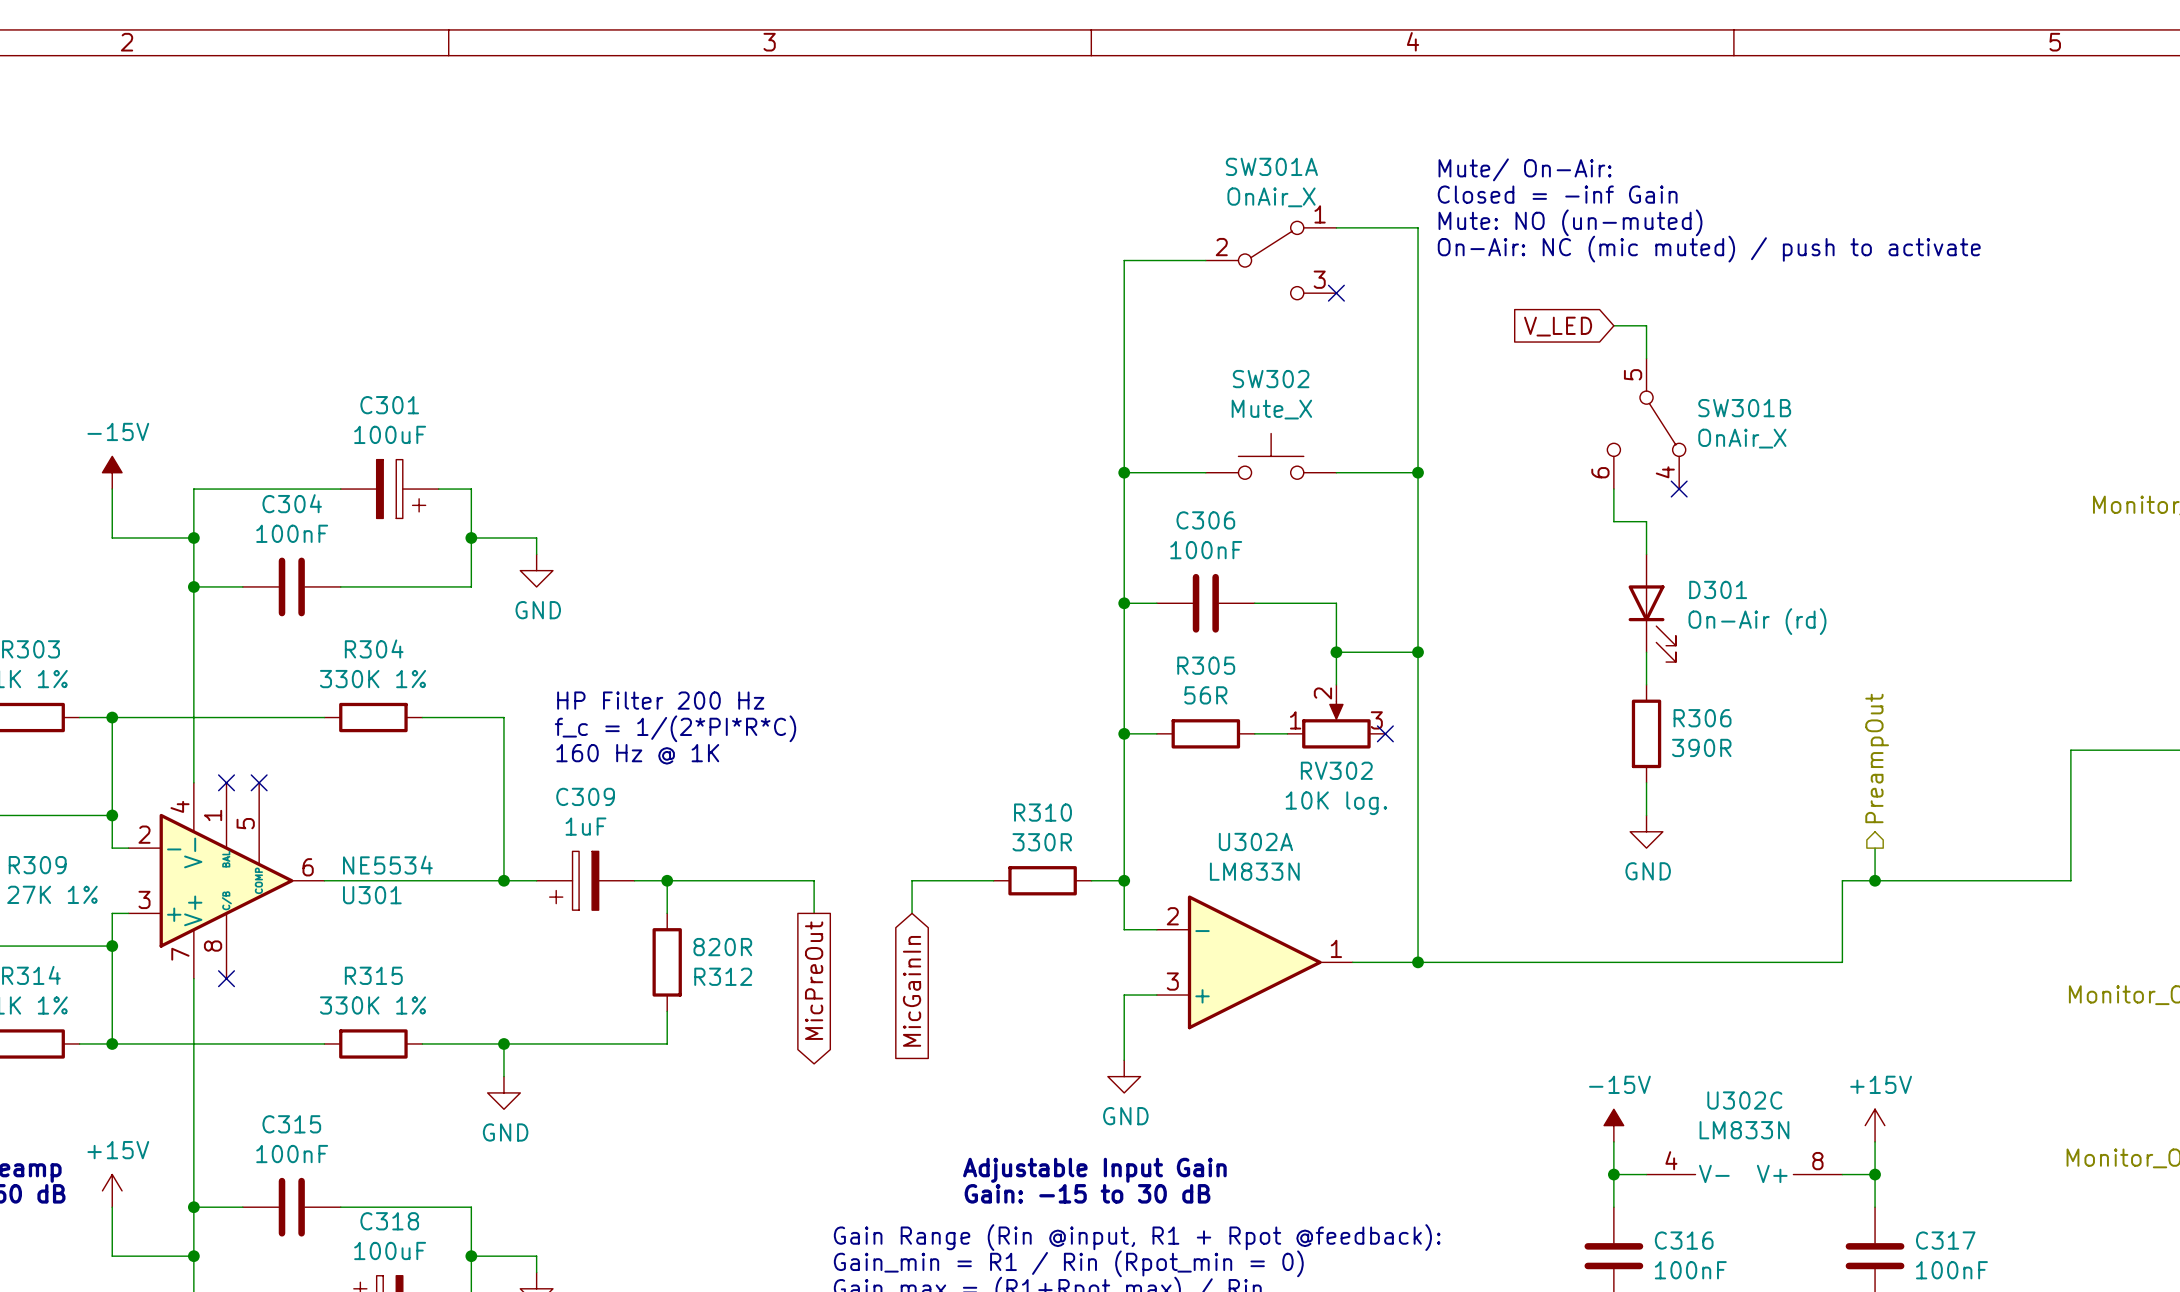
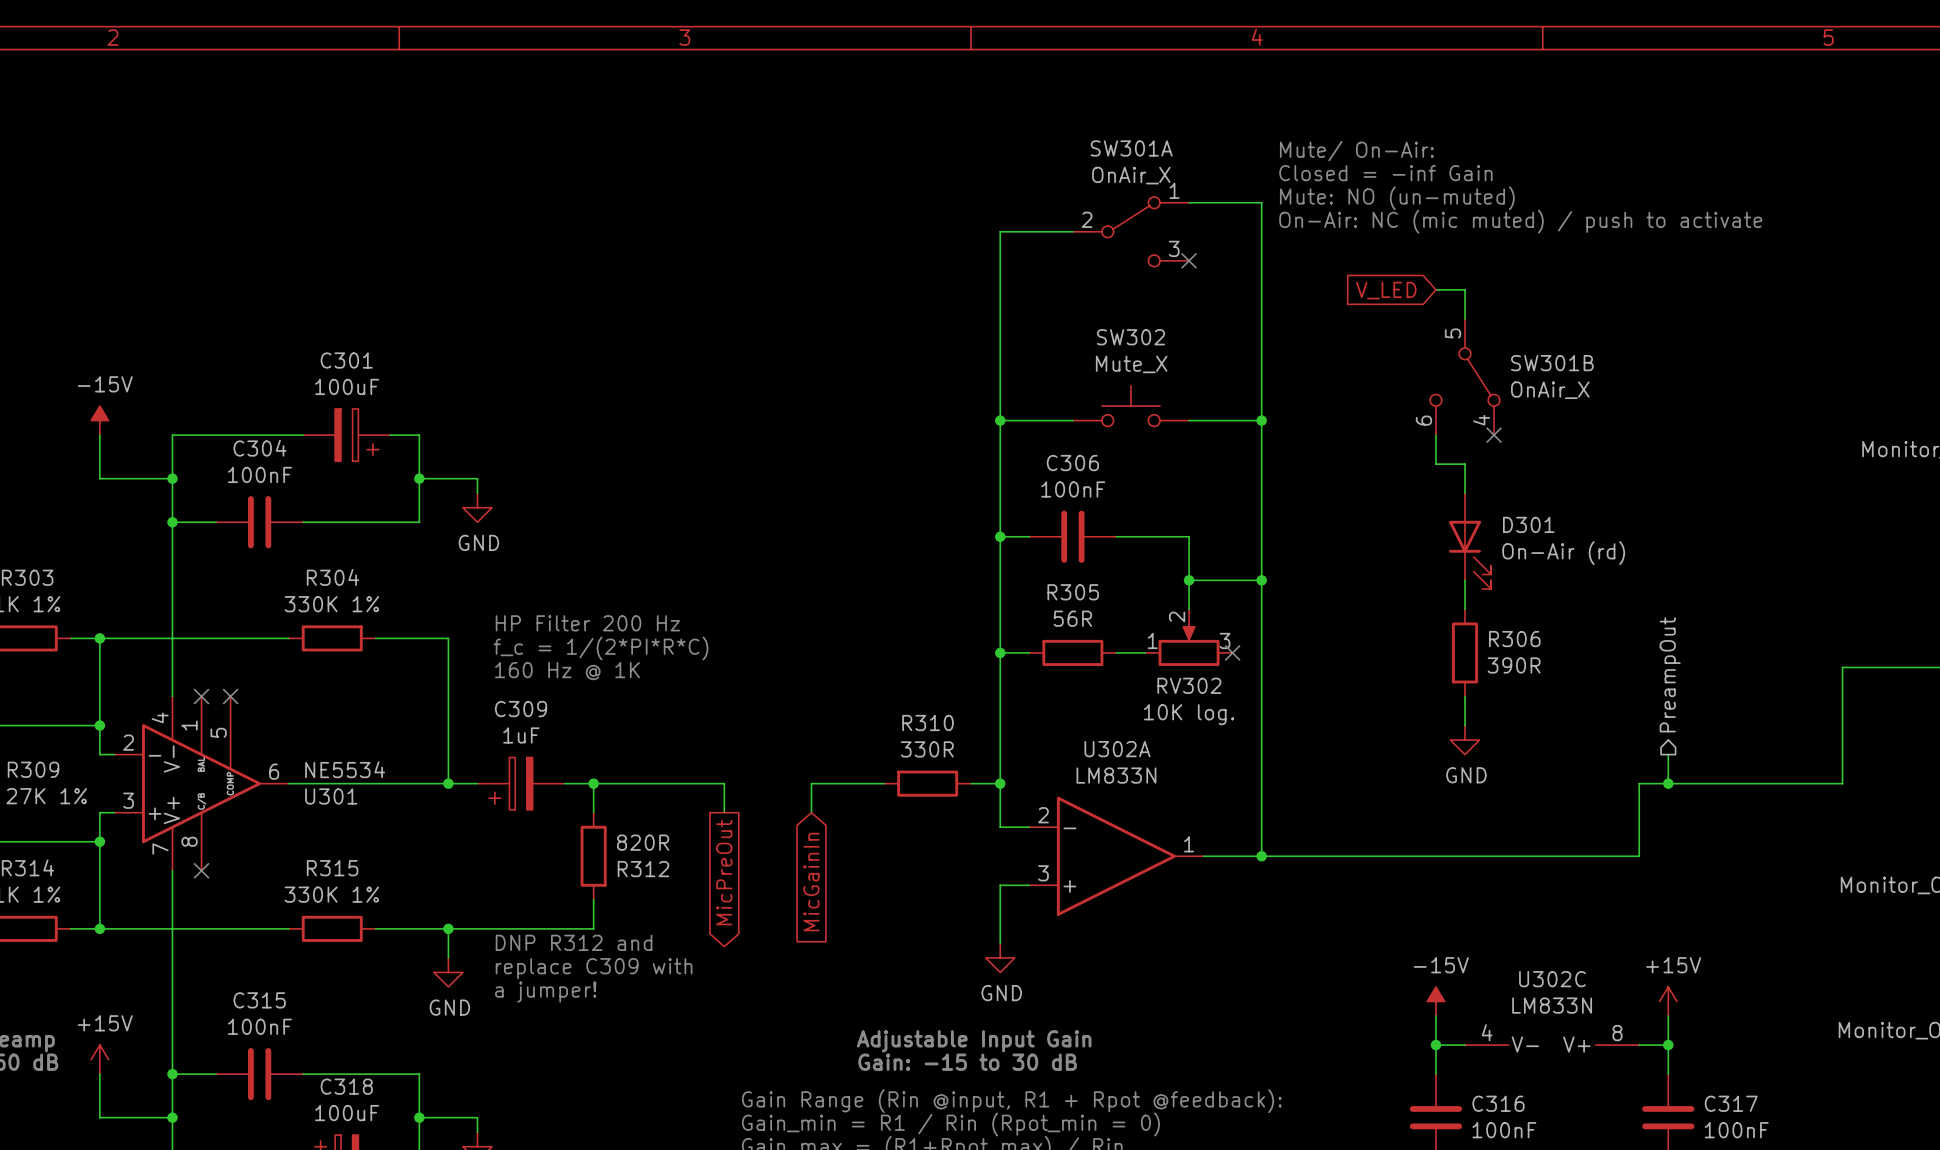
text: none -> DNP R312 and (574, 942)
text: none -> replace C309 with (594, 968)
text: none -> a jumper! (545, 992)

